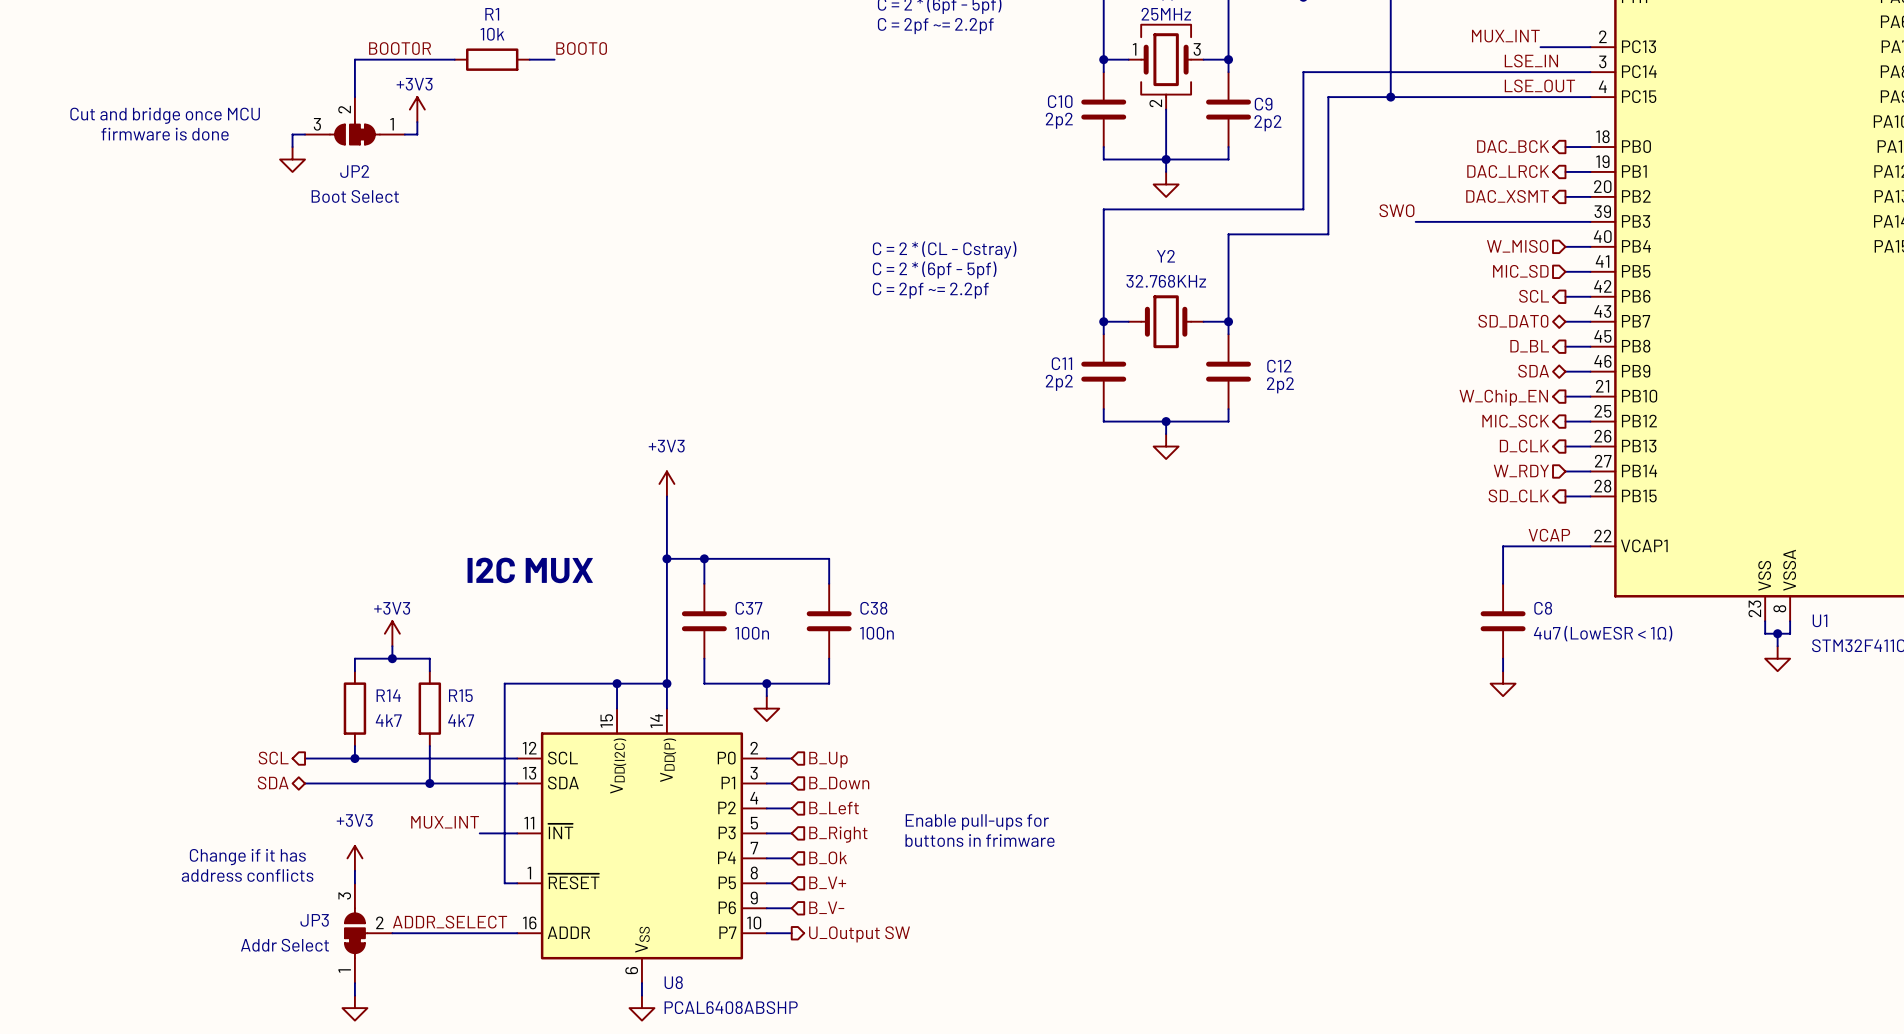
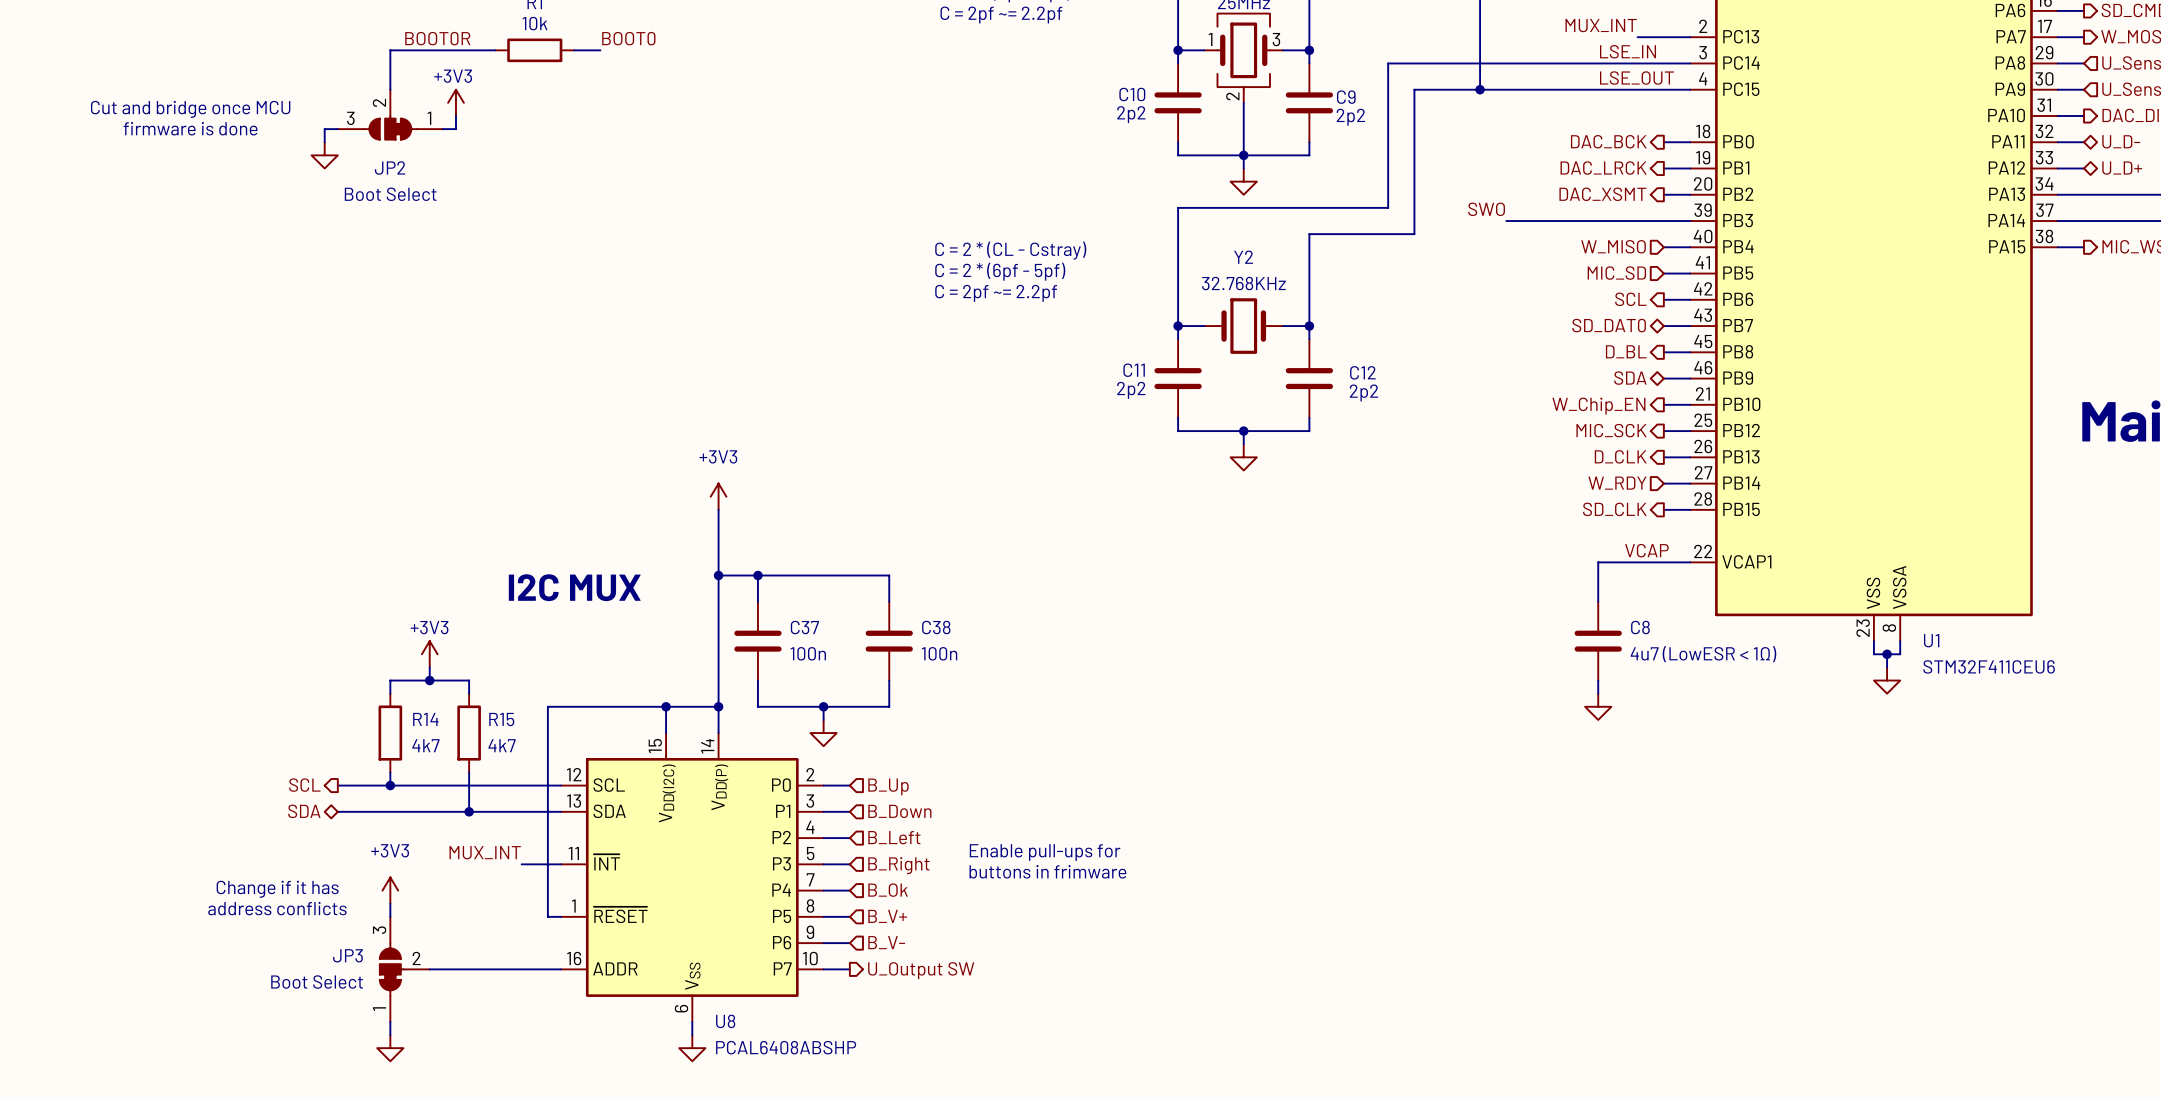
label: ADDR_SELECT (450, 922) -> none
JP3 value: Addr Select (284, 945) -> Boot Select (317, 982)

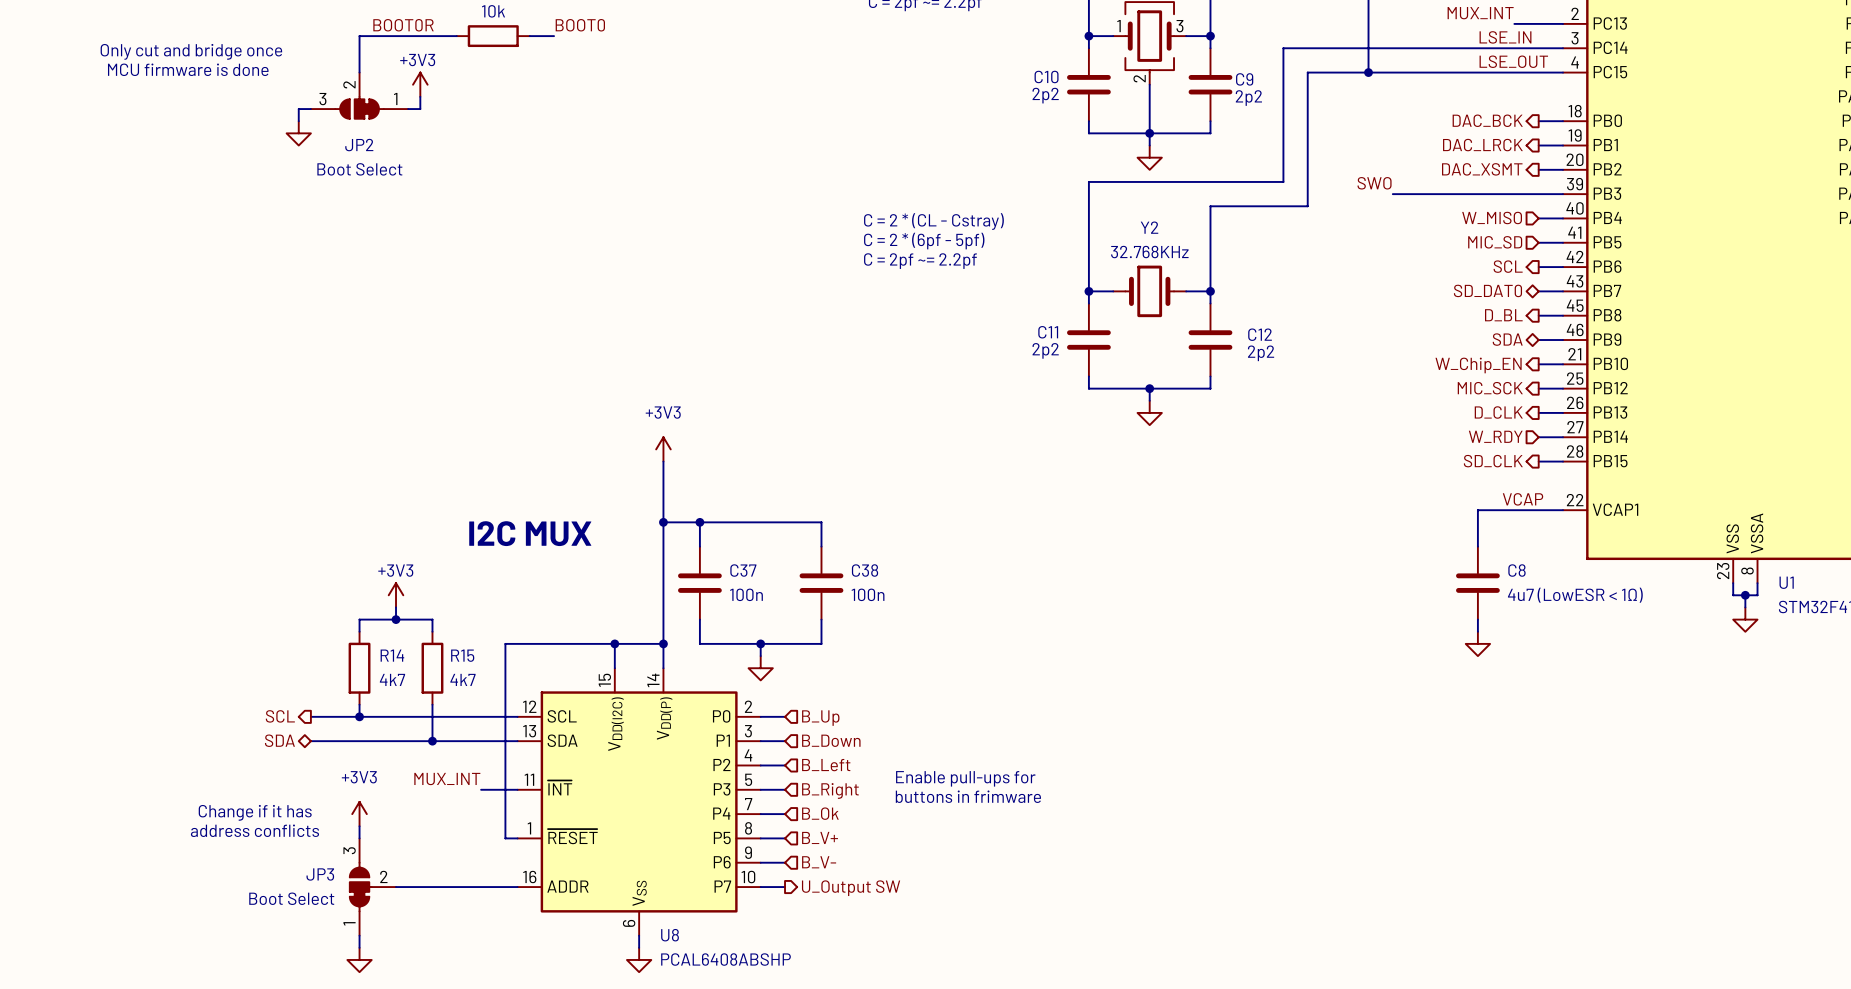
text: none -> Only cut and bridge once (191, 51)
text: none -> MCU firmware is done (188, 69)
text: Cut and bridge once MCU (190, 109) -> none
text: firmware is done (190, 128) -> none

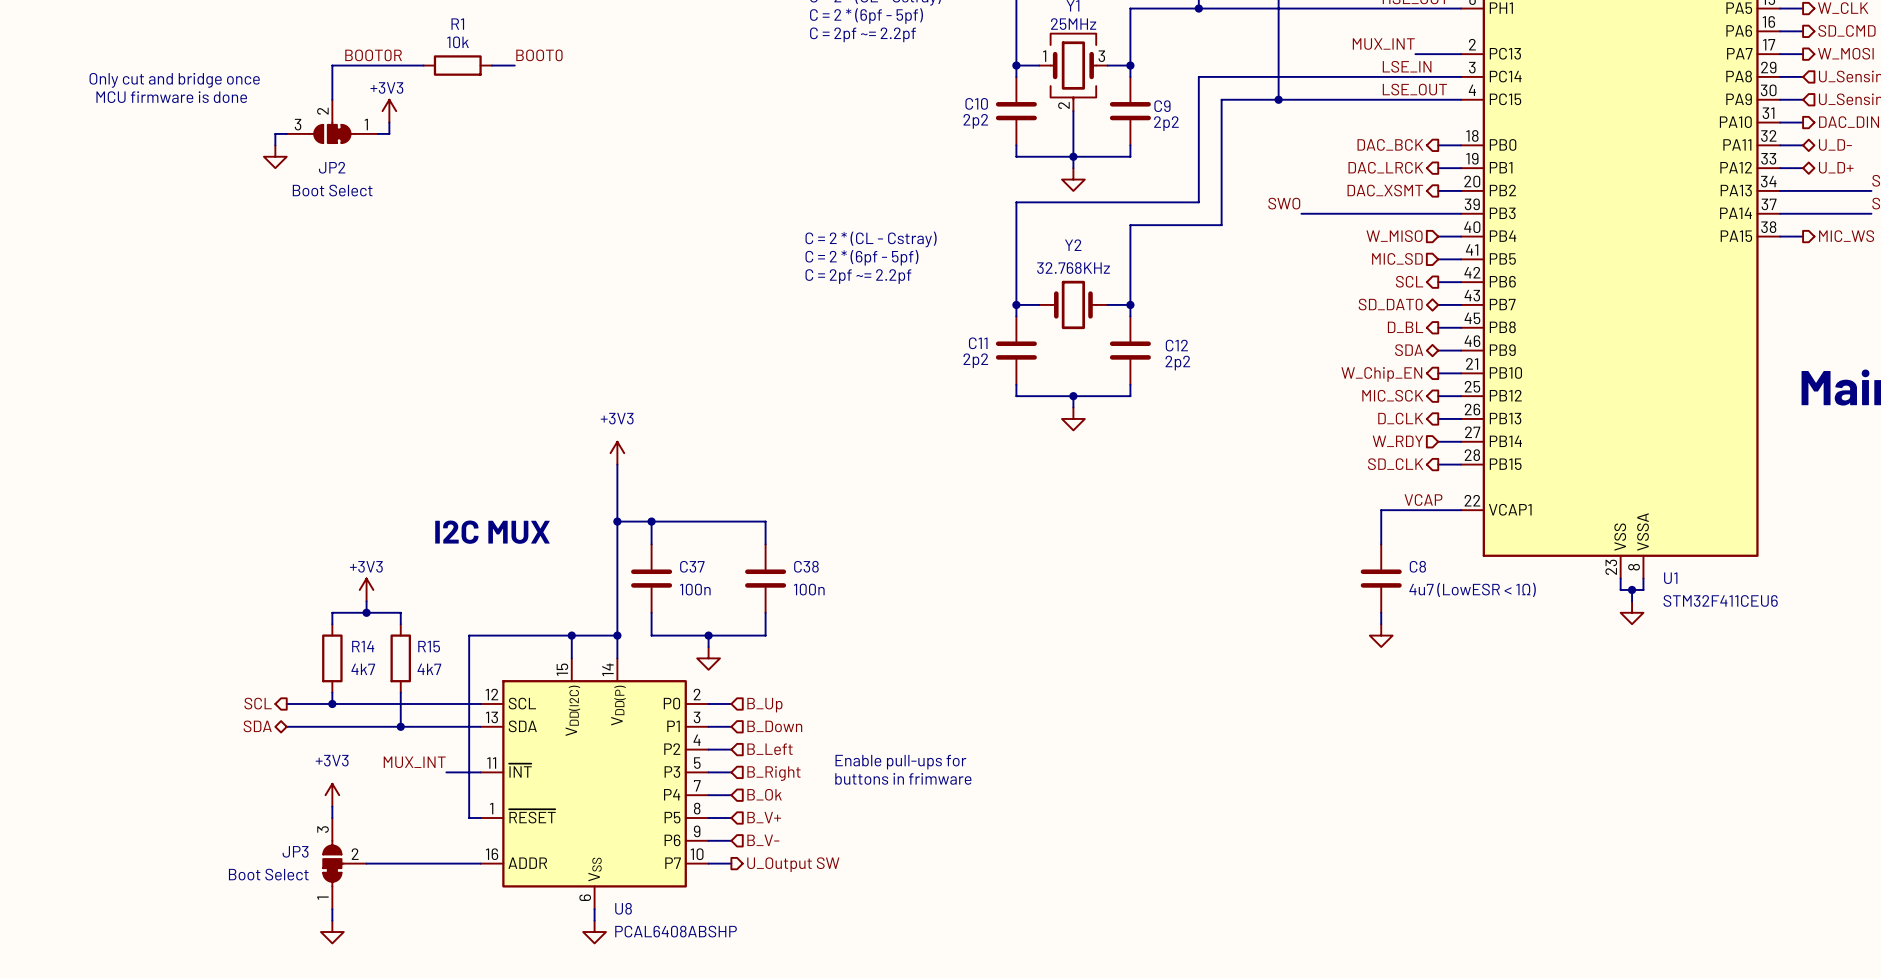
text: Change if it has (255, 812) -> none
text: address conflicts (254, 830) -> none

